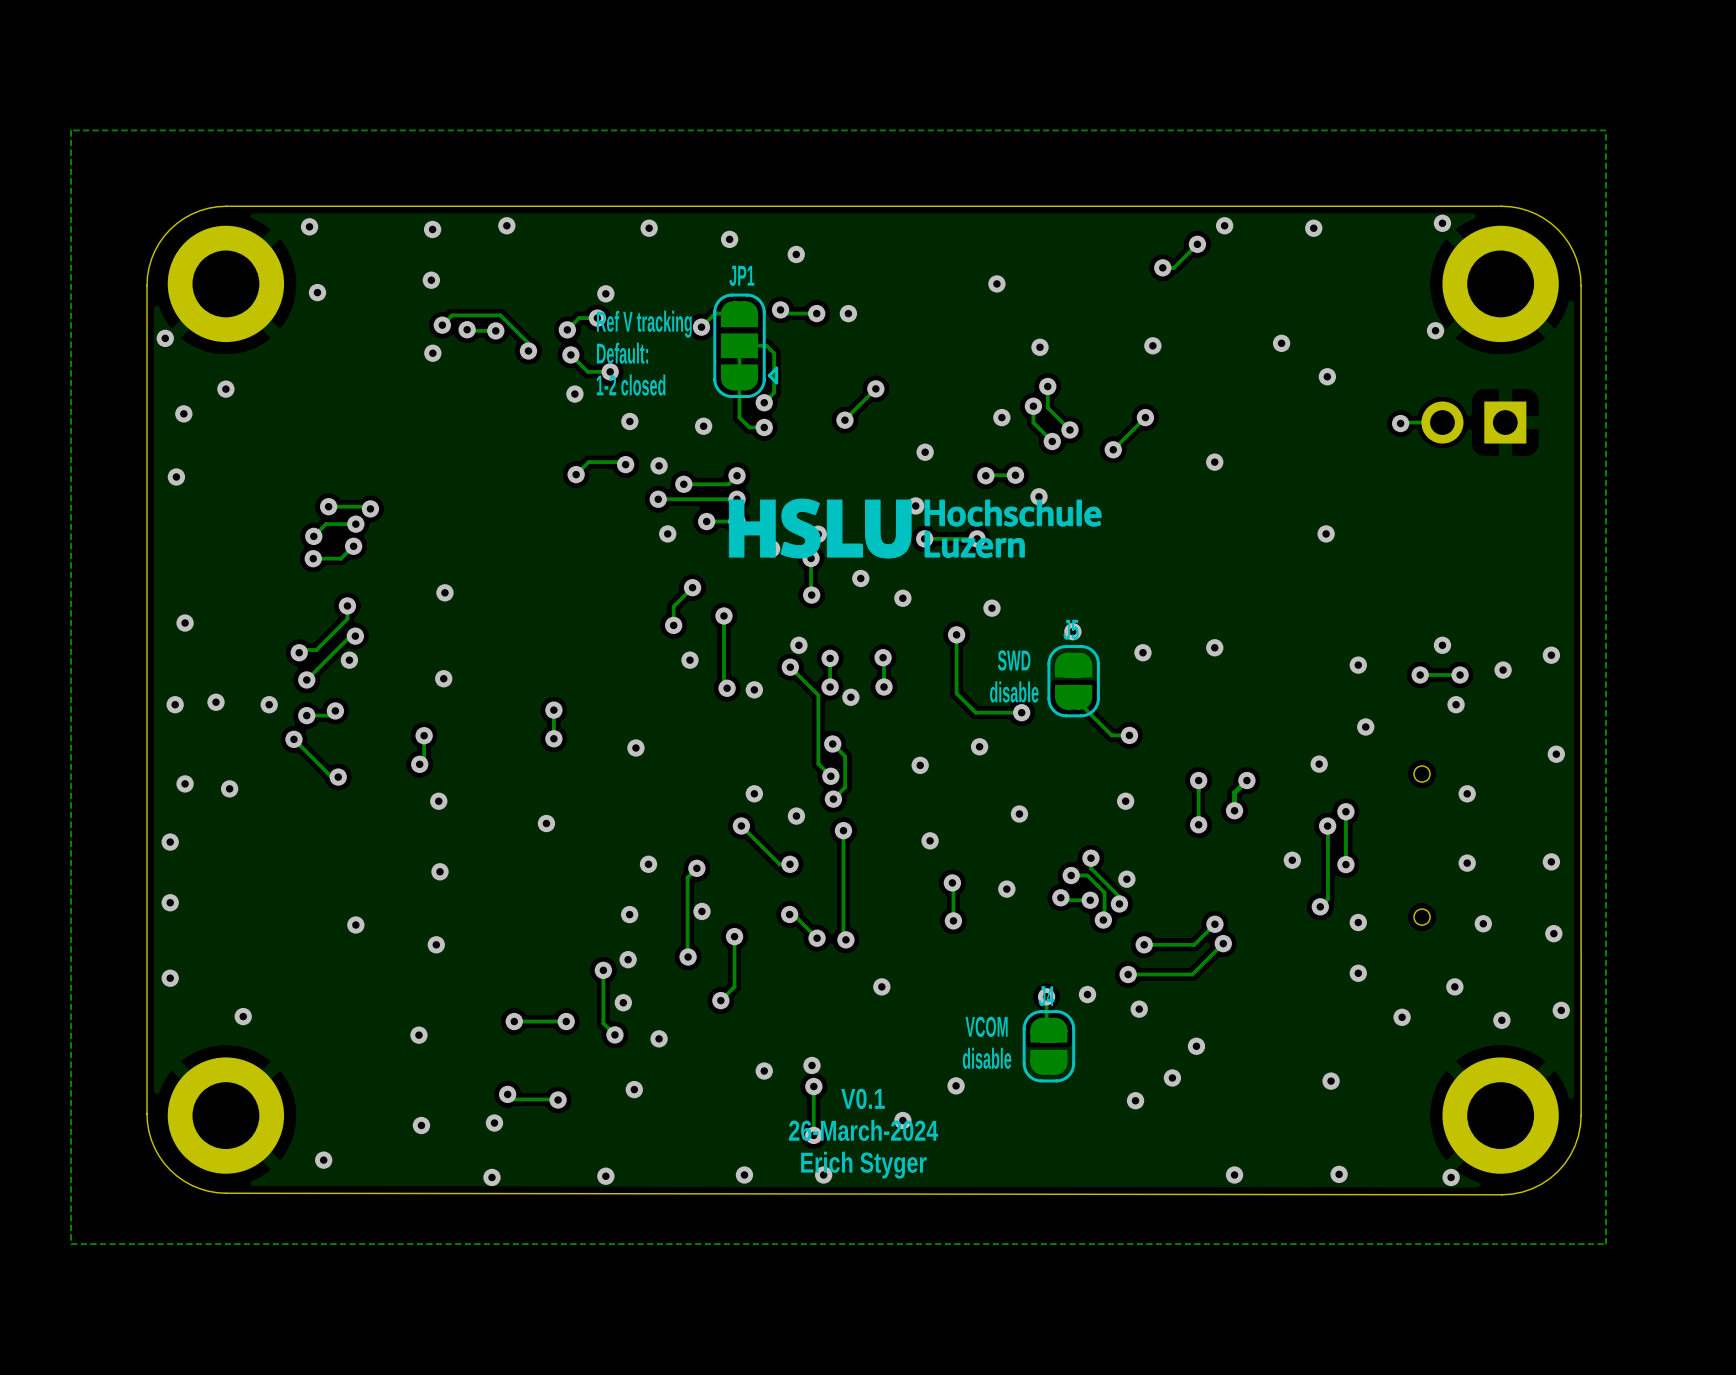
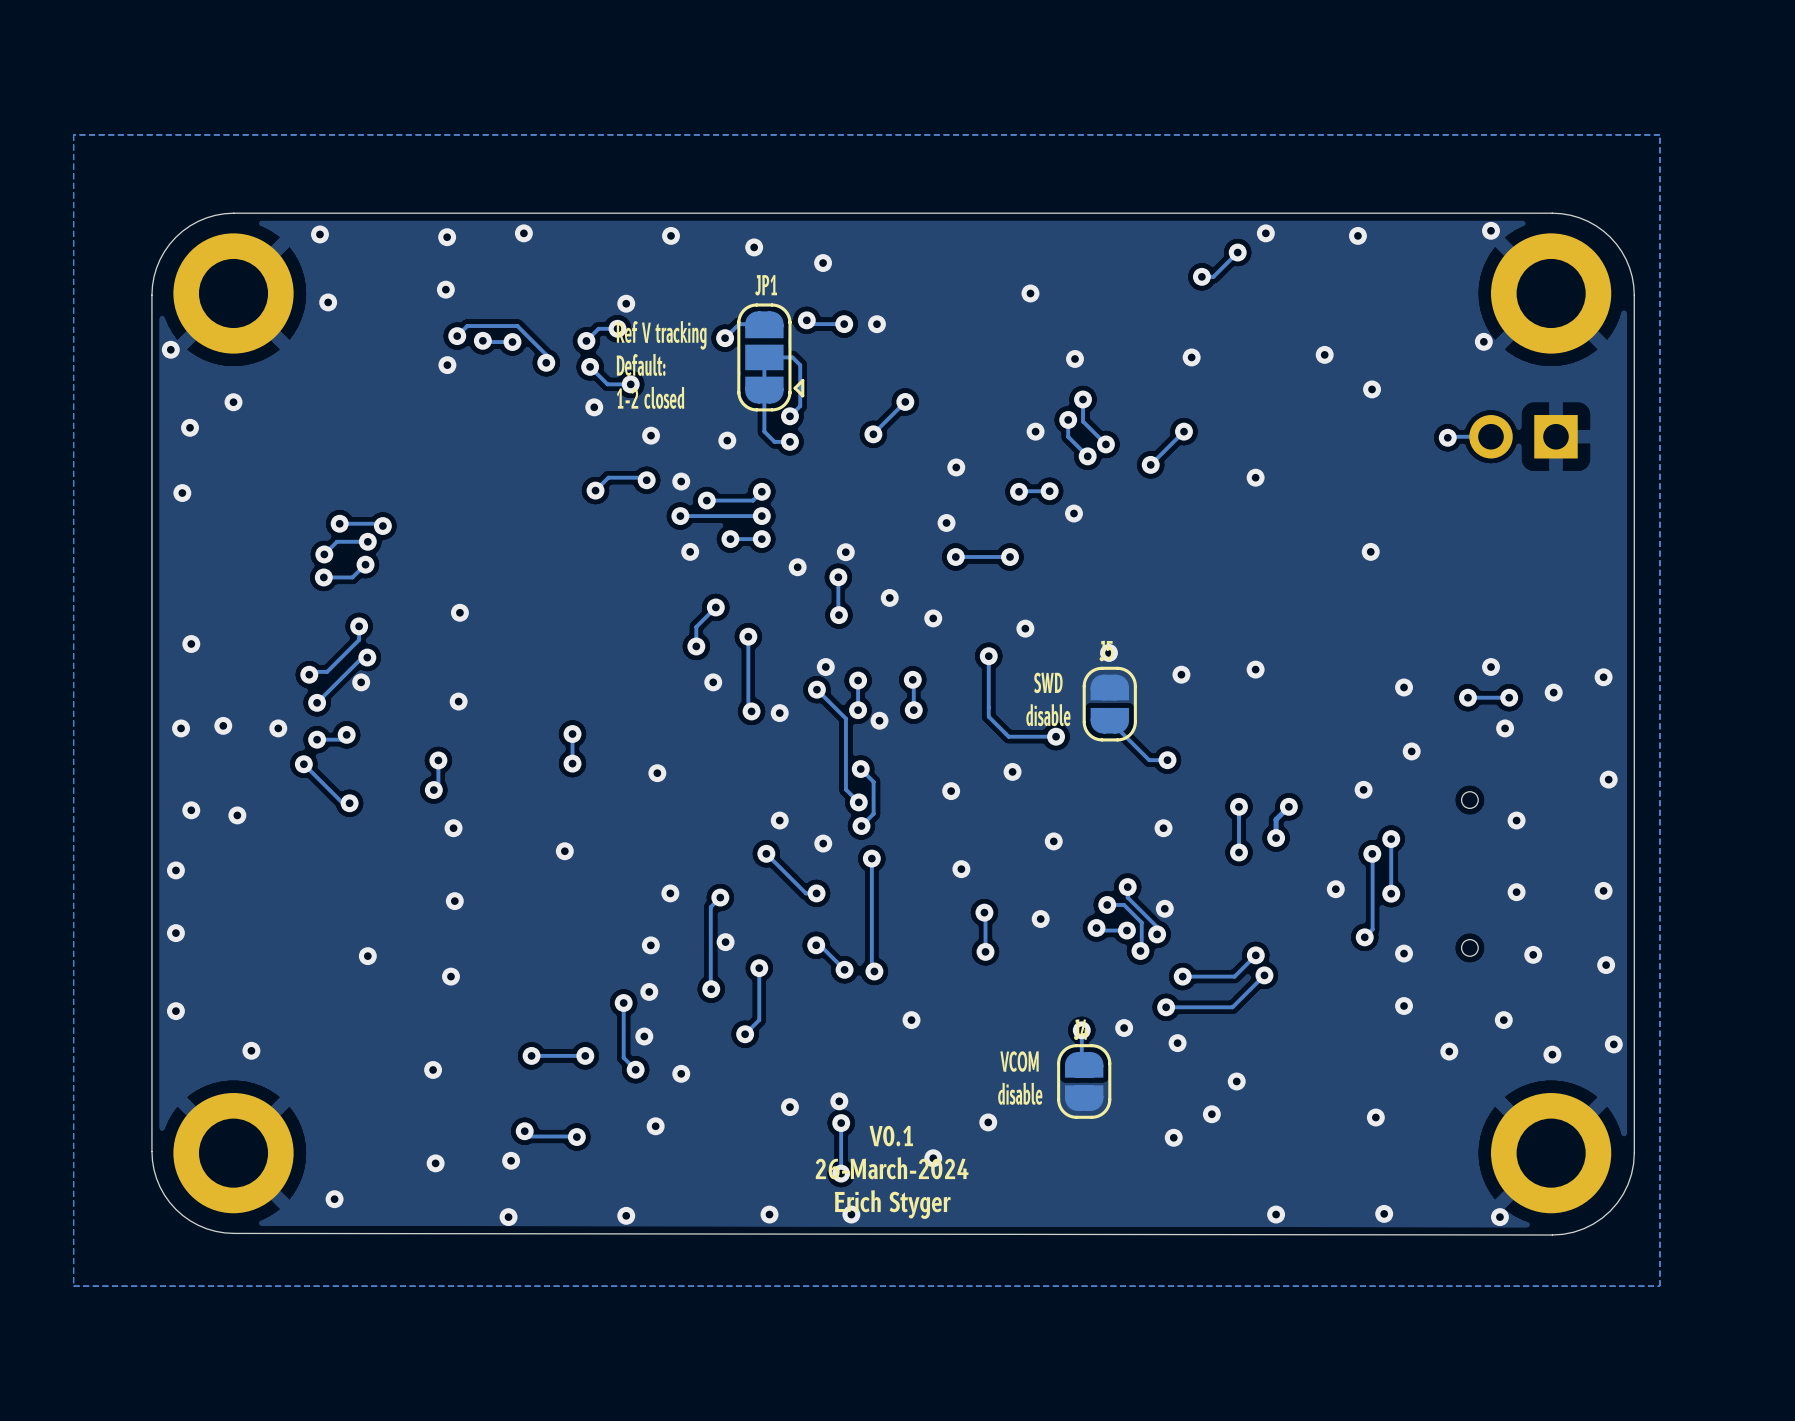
drawing: [728, 498, 1102, 559] -> none

